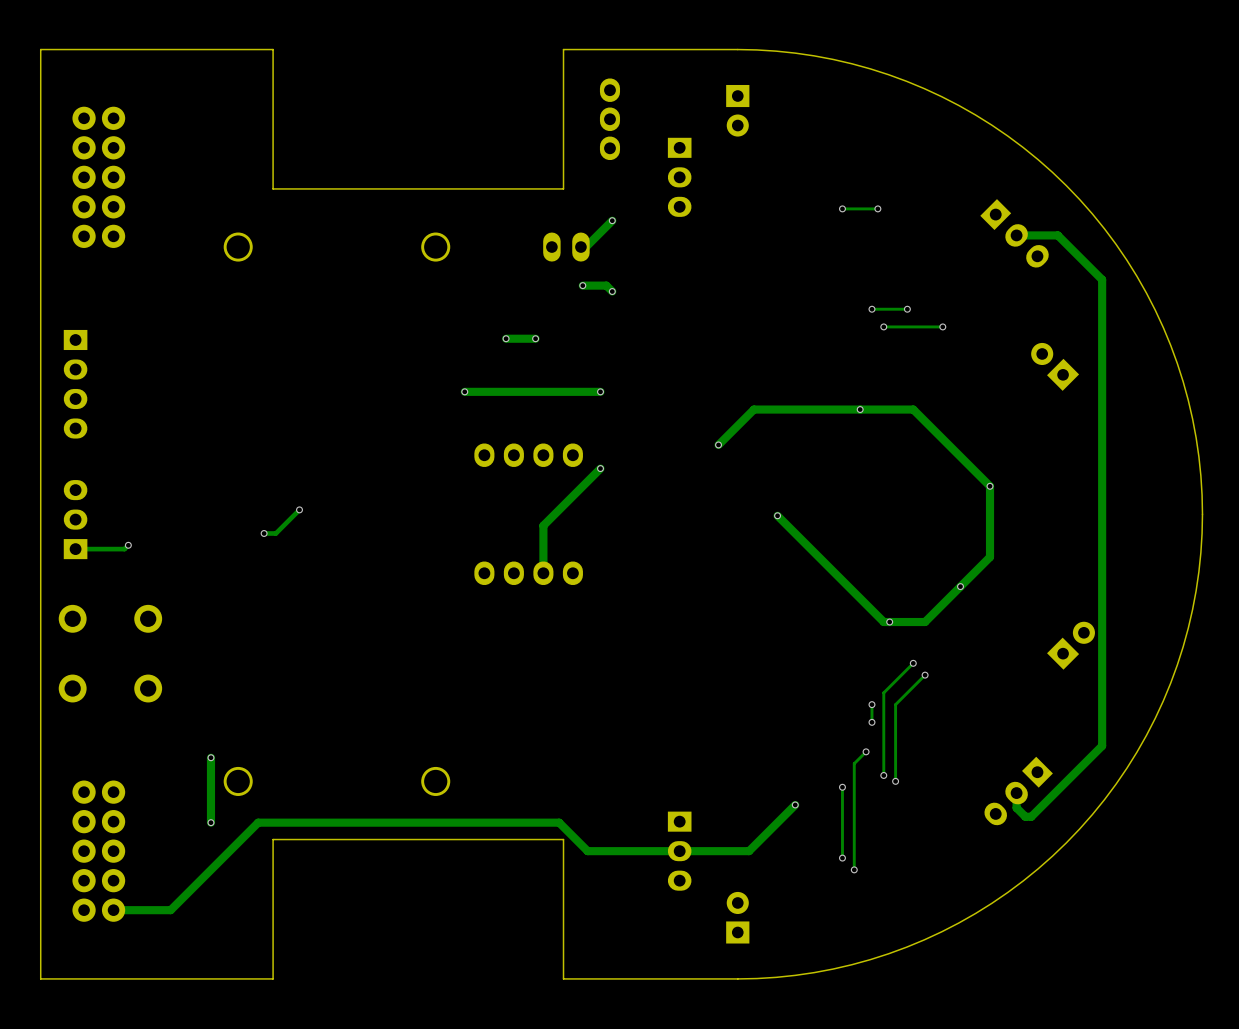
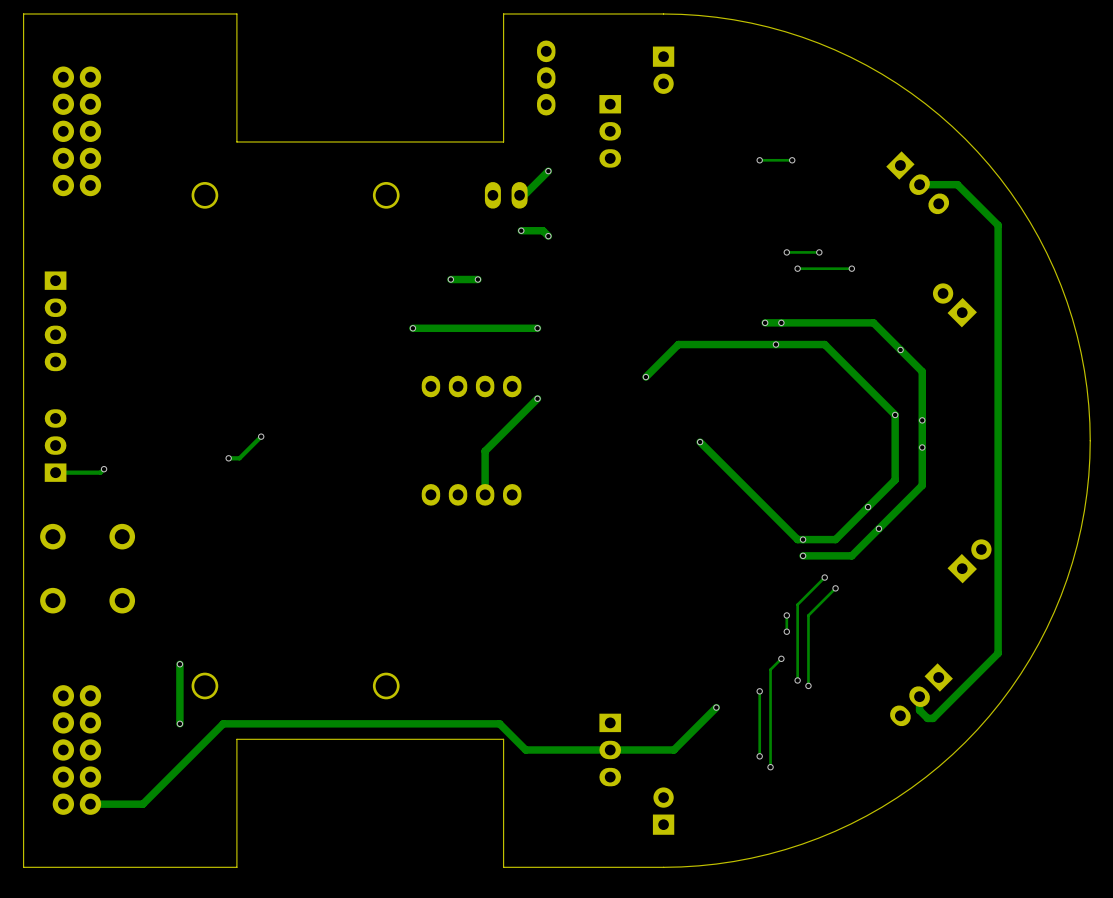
track: none -> (765, 322) (873, 322) (922, 371) (922, 485) (851, 555) (803, 555)
via: none -> (765, 322)
via: none -> (781, 322)
via: none -> (900, 349)
via: none -> (922, 420)
via: none -> (922, 447)
via: none -> (878, 528)
via: none -> (803, 555)

